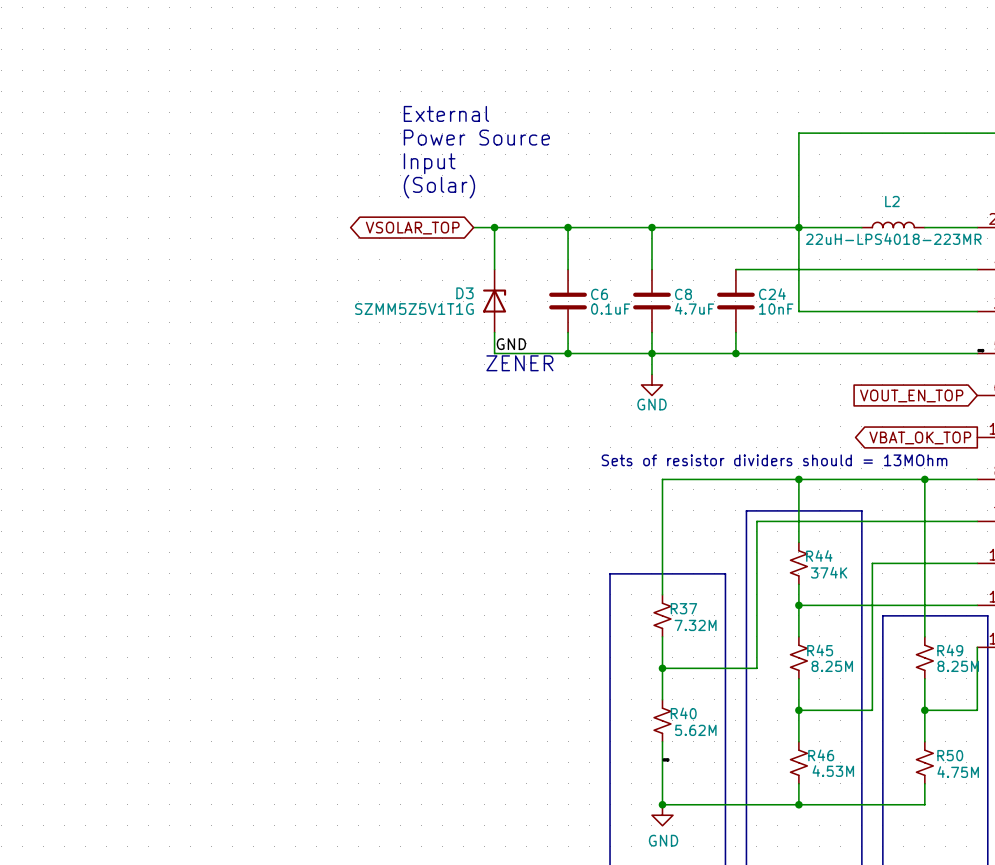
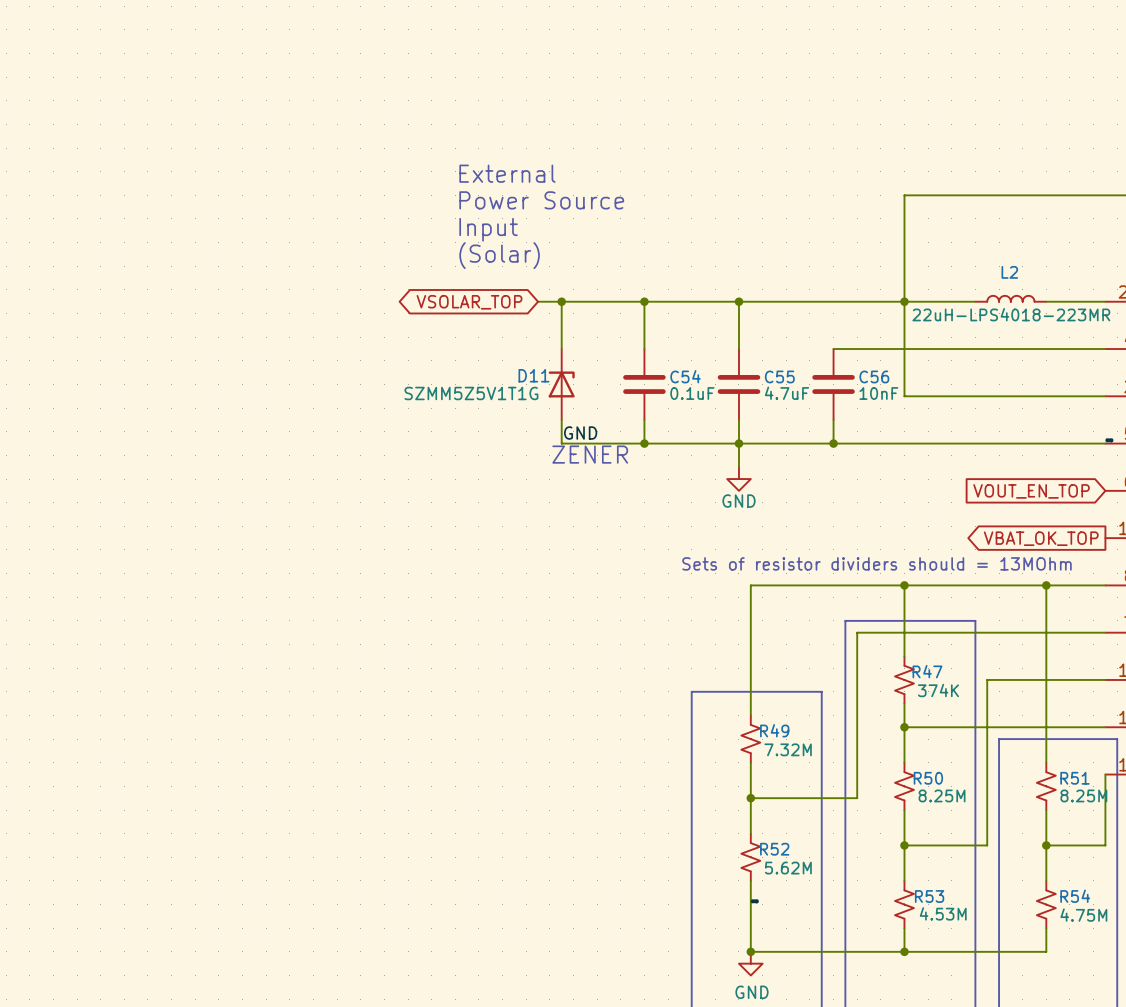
D3 name: D3 (464, 293) -> D11 (533, 375)
C6 name: C6 (599, 294) -> C54 (685, 376)
C8 name: C8 (683, 294) -> C55 (779, 376)
C24 name: C24 (772, 294) -> C56 (874, 376)
R44 name: R44 (819, 555) -> R47 (927, 671)
R37 name: R37 (683, 608) -> R49 (774, 730)
R45 name: R45 (820, 650) -> R50 (928, 778)
R49 name: R49 (950, 650) -> R51 (1074, 778)
R40 name: R40 (683, 713) -> R52 (774, 849)
R46 name: R46 (821, 755) -> R53 (929, 896)
R50 name: R50 (950, 755) -> R54 (1075, 896)

